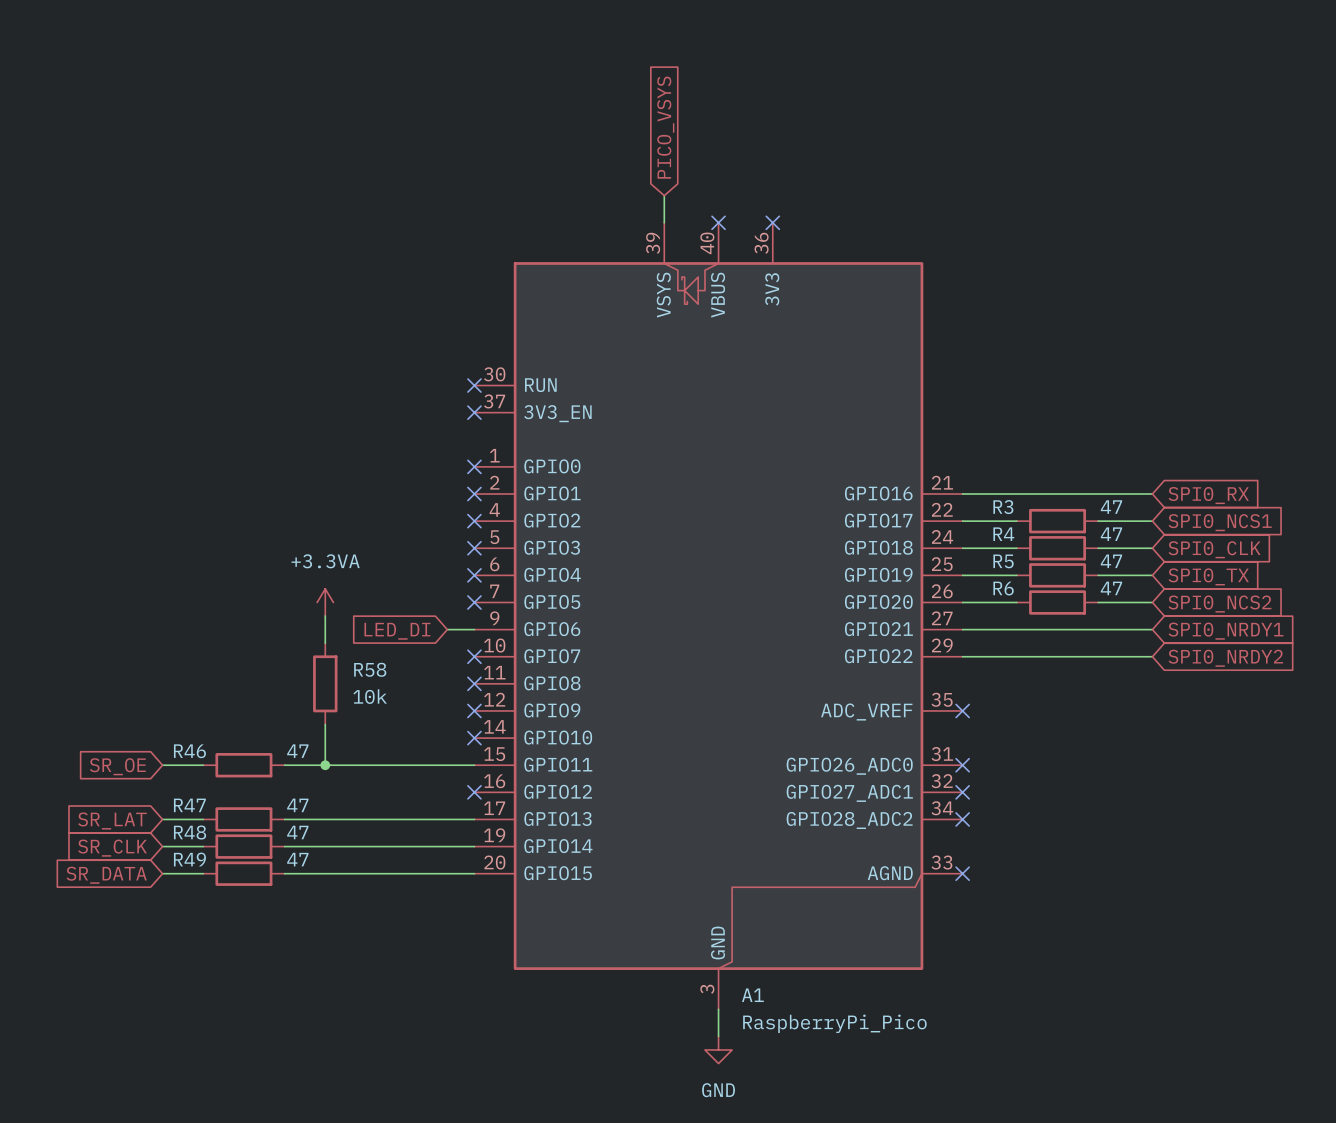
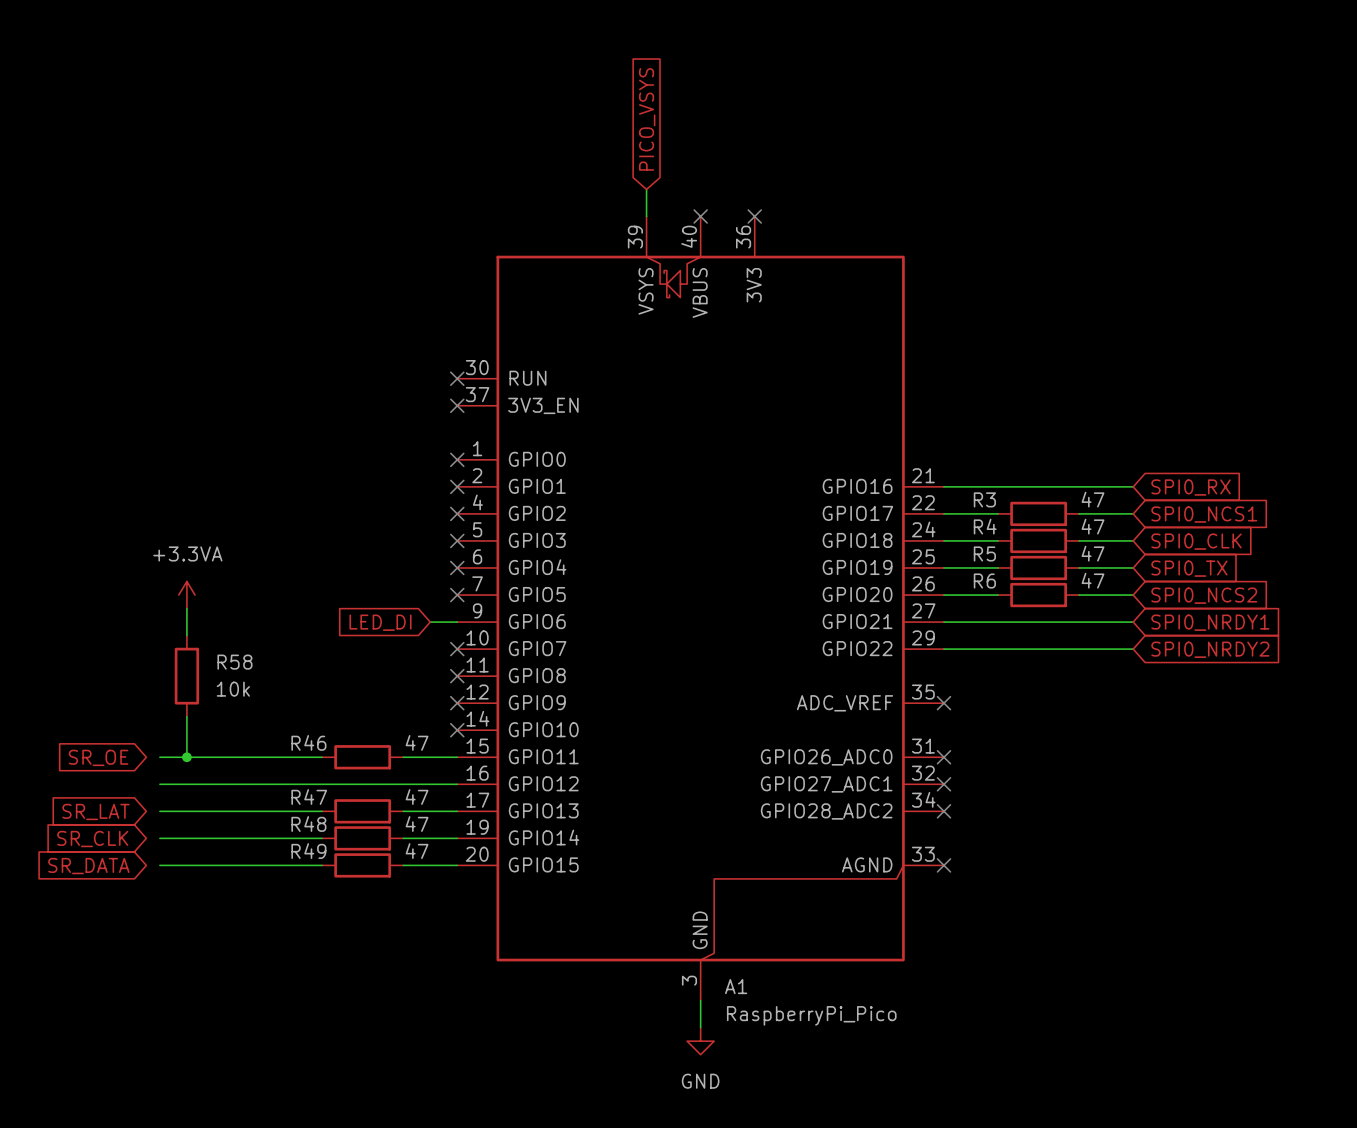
power symbol position: +3.3VA (325, 602) -> +3.3VA (186, 595)
wire: (325, 616) (325, 643) -> (186, 608) (186, 635)
R58 position: (325, 683) -> (186, 676)
wire: none -> (186, 716) (186, 757) (268, 757)
wire: (325, 724) (325, 765) -> none
wire: (162, 765) (176, 765) -> none
junction: none -> (186, 757)
R46 position: (243, 765) -> (362, 757)
junction: (325, 765) -> none
wire: (338, 765) (420, 765) -> none
wire: none -> (159, 784) (457, 784)
no-connect mark: (474, 792) -> none
wire: (162, 819) (176, 819) -> none
R47 position: (243, 819) -> (362, 811)
wire: (338, 819) (420, 819) -> (186, 811) (268, 811)
wire: (162, 846) (176, 846) -> none
R48 position: (243, 846) -> (362, 838)
wire: (338, 846) (420, 846) -> (186, 838) (268, 838)
wire: (162, 873) (176, 873) -> none
R49 position: (243, 873) -> (362, 865)
wire: (338, 873) (420, 873) -> (186, 865) (268, 865)

